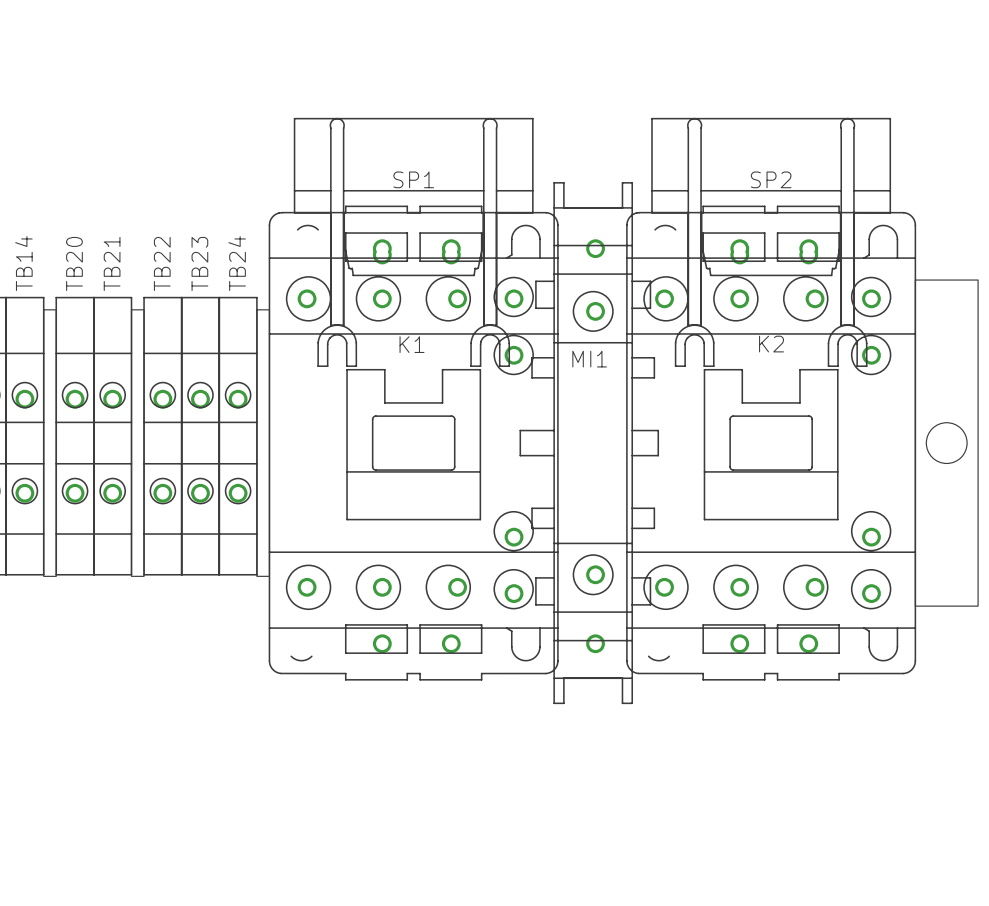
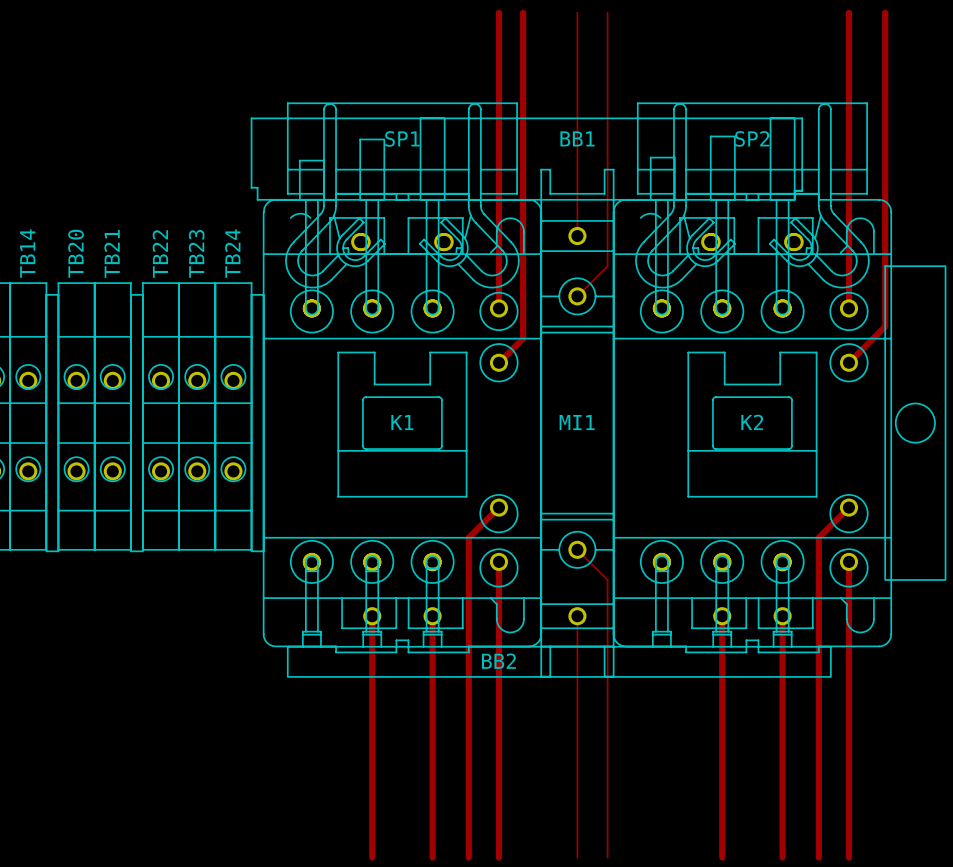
top track: none -> (498, 12) (498, 308)
top track: none -> (523, 12) (523, 338) (498, 362)
top track: none -> (577, 12) (577, 236)
top track: none -> (607, 12) (607, 266) (577, 296)
top track: none -> (848, 12) (848, 308)
top track: none -> (885, 12) (885, 326) (848, 362)
SP1 footprint: [293, 117, 534, 367] -> [285, 102, 520, 289]
SP2 footprint: [651, 117, 892, 367] -> [635, 102, 870, 289]
MI1 footprint: [519, 182, 660, 705] -> [540, 168, 615, 678]
K1 footprint: [268, 205, 559, 681] -> [262, 193, 542, 654]
K2 footprint: [626, 205, 917, 681] -> [612, 193, 892, 654]
BB1: none -> (526, 217)
K1 name position: K1 (412, 344) -> K1 (402, 422)
K2 name position: K2 (771, 344) -> K2 (752, 422)
MI1 name position: MI1 (589, 359) -> MI1 (577, 422)
top track: none -> (498, 507) (468, 537) (468, 857)
top track: none -> (848, 507) (818, 537) (818, 857)
top track: none -> (577, 549) (607, 580) (607, 857)
top track: none -> (498, 561) (498, 857)
top track: none -> (848, 561) (848, 857)
BB2: none -> (559, 615)
top track: none -> (372, 616) (372, 857)
top track: none -> (432, 616) (432, 857)
top track: none -> (577, 616) (577, 857)
top track: none -> (722, 616) (722, 857)
top track: none -> (782, 616) (782, 857)

